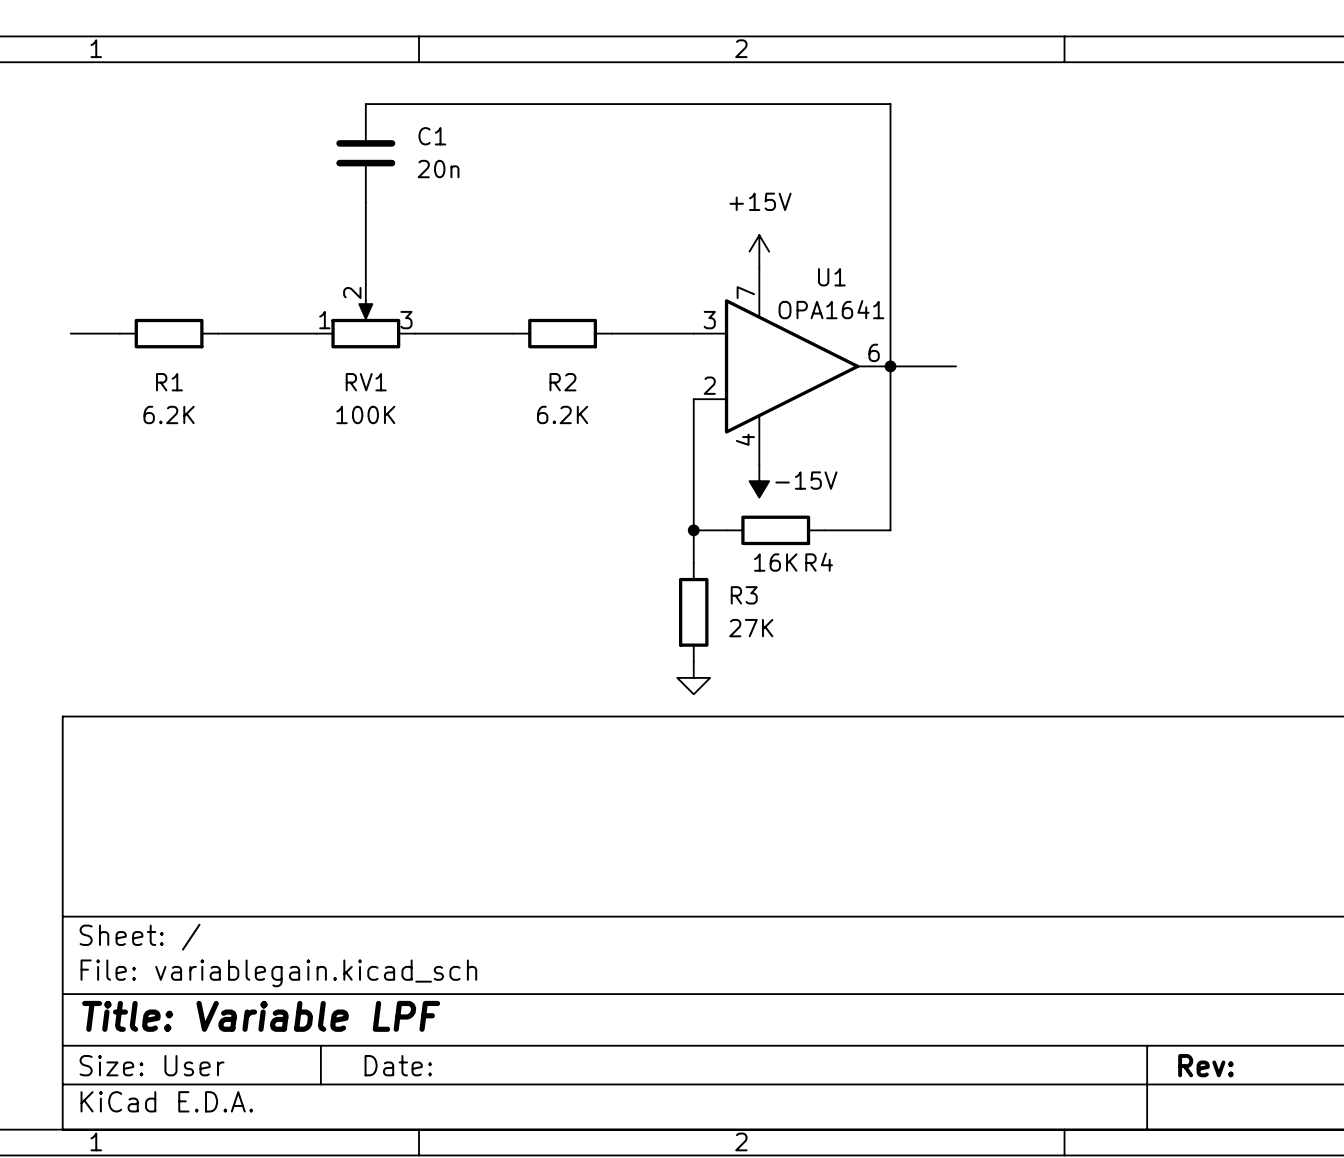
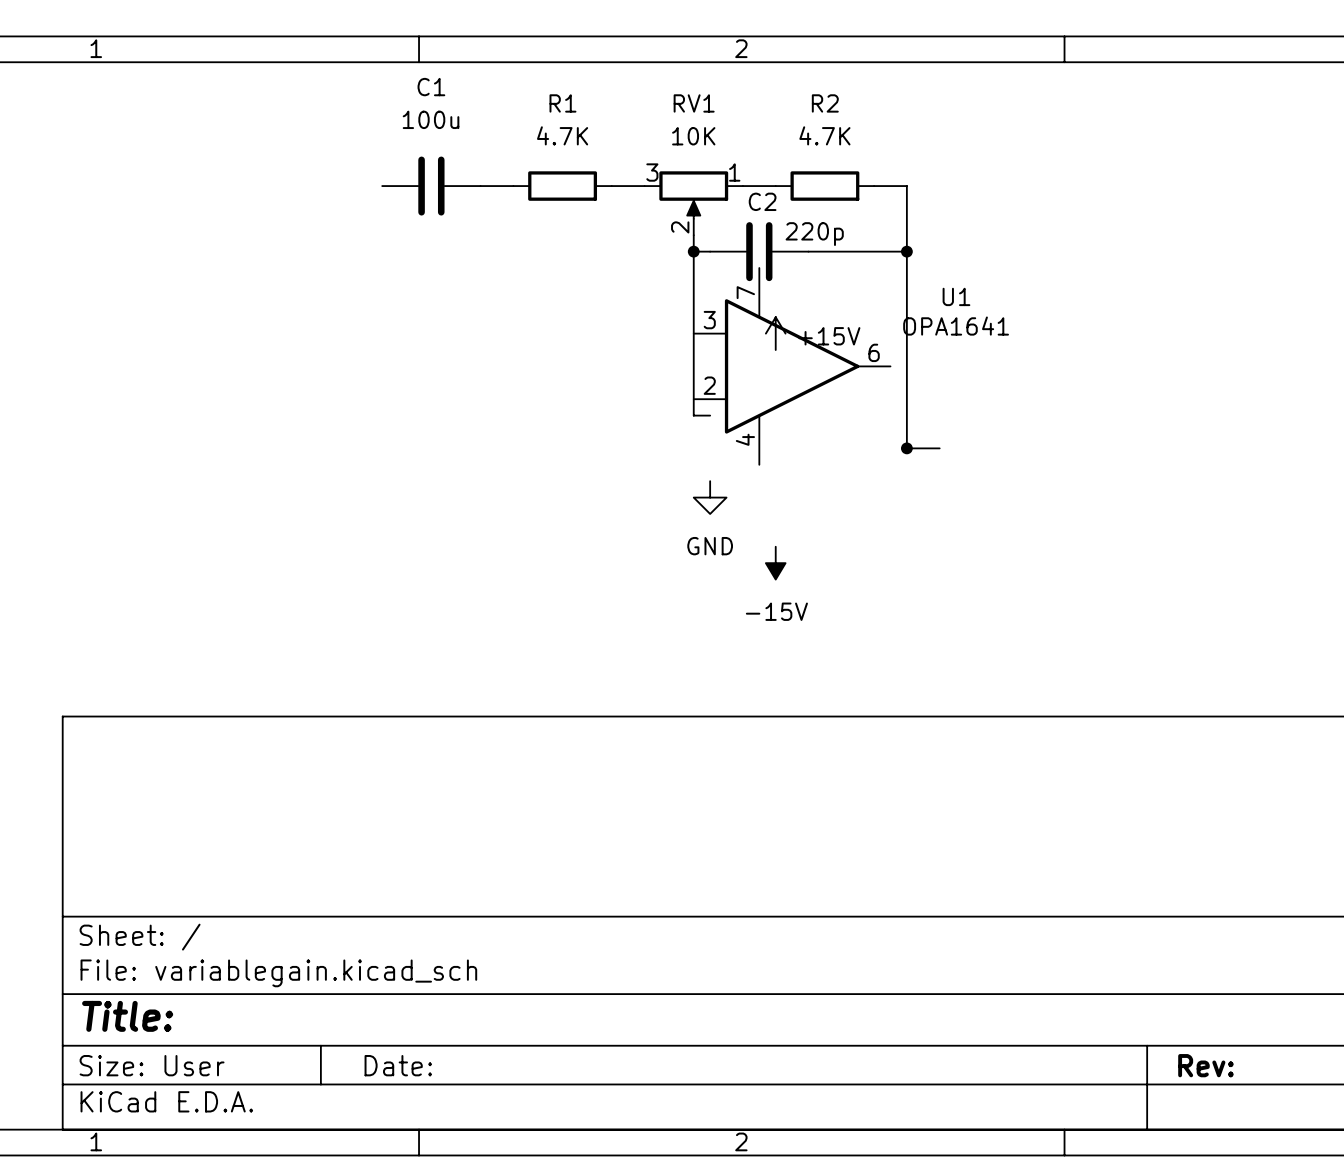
wire: (365, 104) (890, 104) (890, 530) (824, 530) -> none
C1 name position: C1 (432, 136) -> C1 (431, 87)
C1 rotation: 0° (365, 153) -> 90° clockwise (431, 186)
C1 position: (365, 153) -> (431, 186)
C1 value: 20n (438, 169) -> 100u (431, 119)
wire: none -> (480, 186) (513, 186)
wire: none -> (611, 186) (644, 186)
wire: none -> (742, 186) (775, 186)
wire: none -> (874, 186) (906, 186) (906, 448) (939, 448)
power symbol text position: +15V (760, 201) -> +15V (829, 336)
wire: (365, 202) (365, 284) -> none
wire: none -> (693, 235) (693, 399)
wire: none -> (693, 251) (710, 251)
junction: none -> (693, 251)
C2: none -> 220p (759, 251)
power symbol position: +15V (759, 251) -> +15V (775, 333)
wire: none -> (808, 251) (906, 251)
junction: none -> (906, 251)
U1 name position: U1 (831, 277) -> U1 (956, 296)
U1 value position: OPA1641 (831, 309) -> OPA1641 (956, 326)
RV1 position: (365, 316) -> (693, 203)
RV1 rotation: 0° (365, 324) -> 180° (693, 195)
wire: (70, 333) (119, 333) -> none
R1 position: (169, 333) -> (562, 186)
wire: (218, 333) (316, 333) -> none
wire: (415, 333) (513, 333) -> none
R2 position: (562, 333) -> (824, 186)
wire: (611, 333) (693, 333) -> none
wire: (890, 366) (956, 366) -> none
junction: (890, 366) -> none
R1 name position: R1 (169, 382) -> R1 (562, 103)
RV1 name position: RV1 (366, 382) -> RV1 (694, 103)
R2 name position: R2 (562, 382) -> R2 (825, 103)
R1 value: 6.2K (169, 414) -> 4.7K (562, 135)
RV1 value: 100K (365, 414) -> 10K (693, 136)
R2 value: 6.2K (562, 414) -> 4.7K (824, 135)
wire: (693, 415) (693, 563) -> (693, 415) (710, 415)
junction: none -> (906, 448)
power symbol text position: -15V (806, 480) -> -15V (776, 611)
power symbol position: -15V (759, 481) -> -15V (775, 563)
power symbol: none -> GND (710, 497)
wire: (693, 530) (726, 530) -> none
junction: (693, 530) -> none
R4: 16K (775, 530) -> none
R3: 27K (693, 612) -> none
power symbol: (693, 677) -> none
title block: Title: Variable LPF (261, 1016) -> Title: (127, 1016)

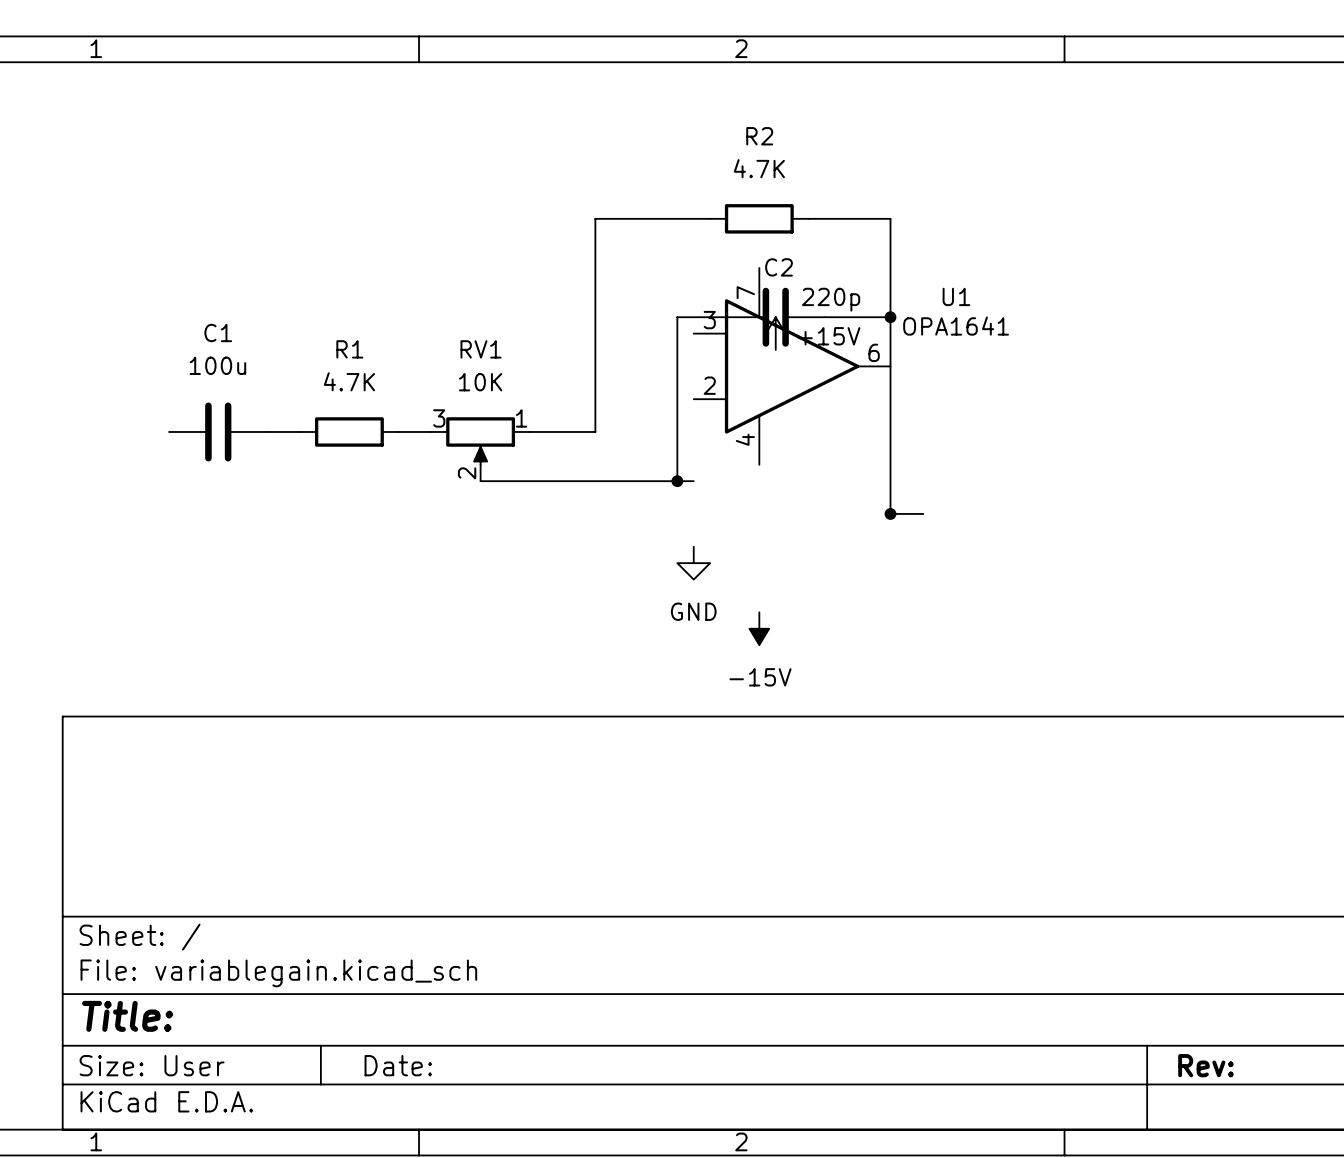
C1 position: (431, 186) -> (218, 431)
wire: (480, 186) (513, 186) -> (398, 431) (431, 431)
R1 position: (562, 186) -> (349, 431)
wire: (611, 186) (644, 186) -> none
wire: (742, 186) (775, 186) -> none
R2 position: (824, 186) -> (759, 218)
wire: (874, 186) (906, 186) (906, 448) (939, 448) -> none
RV1 position: (693, 203) -> (480, 449)
wire: none -> (710, 218) (595, 218) (595, 431) (529, 431)
wire: none -> (808, 218) (890, 218) (890, 513) (923, 513)
wire: (693, 235) (693, 415) (710, 415) -> none
wire: (693, 251) (710, 251) -> none
junction: (693, 251) -> none
C2 position: (759, 251) -> (775, 317)
wire: (808, 251) (906, 251) -> none
junction: (906, 251) -> none
wire: none -> (726, 317) (677, 317) (677, 481)
wire: none -> (824, 317) (890, 317)
junction: none -> (890, 317)
wire: none -> (267, 431) (300, 431)
junction: (906, 448) -> none
wire: none -> (480, 481) (693, 481)
junction: none -> (677, 481)
power symbol position: GND (710, 497) -> GND (693, 563)
junction: none -> (890, 513)
power symbol position: -15V (775, 563) -> -15V (759, 628)

